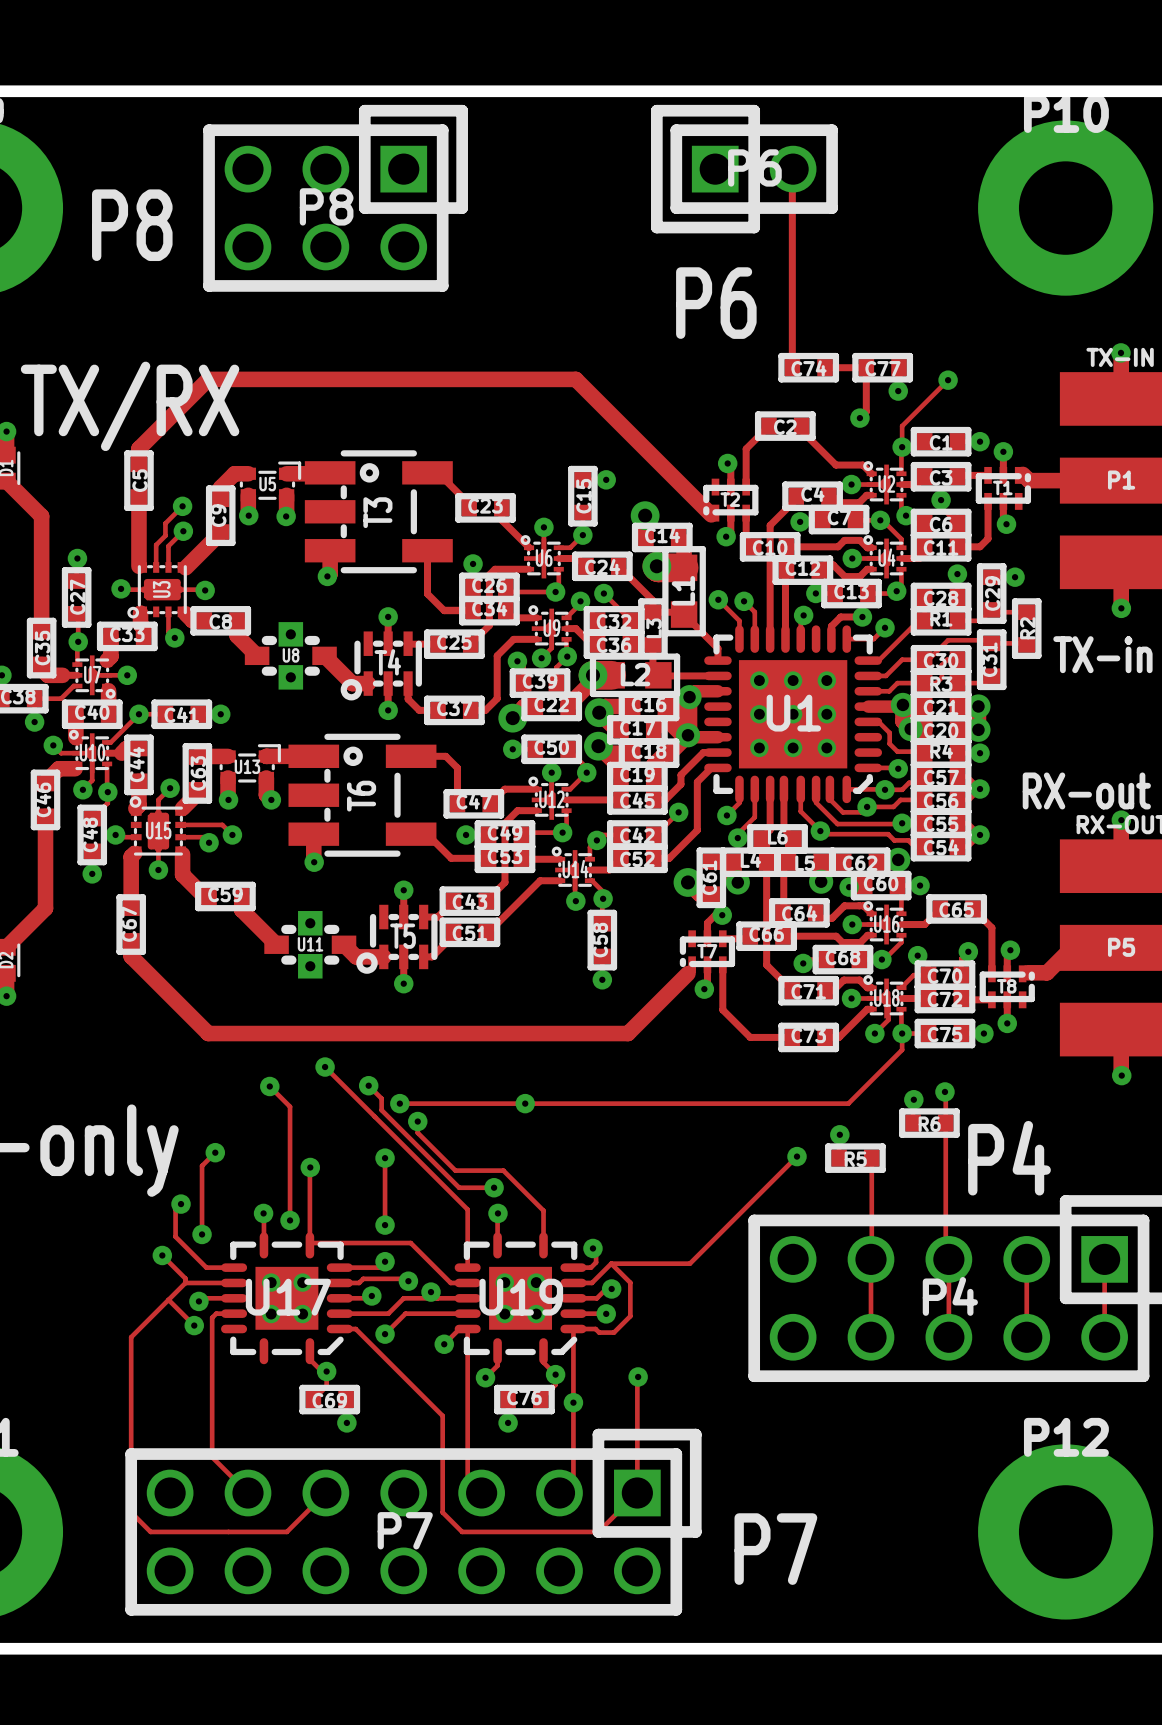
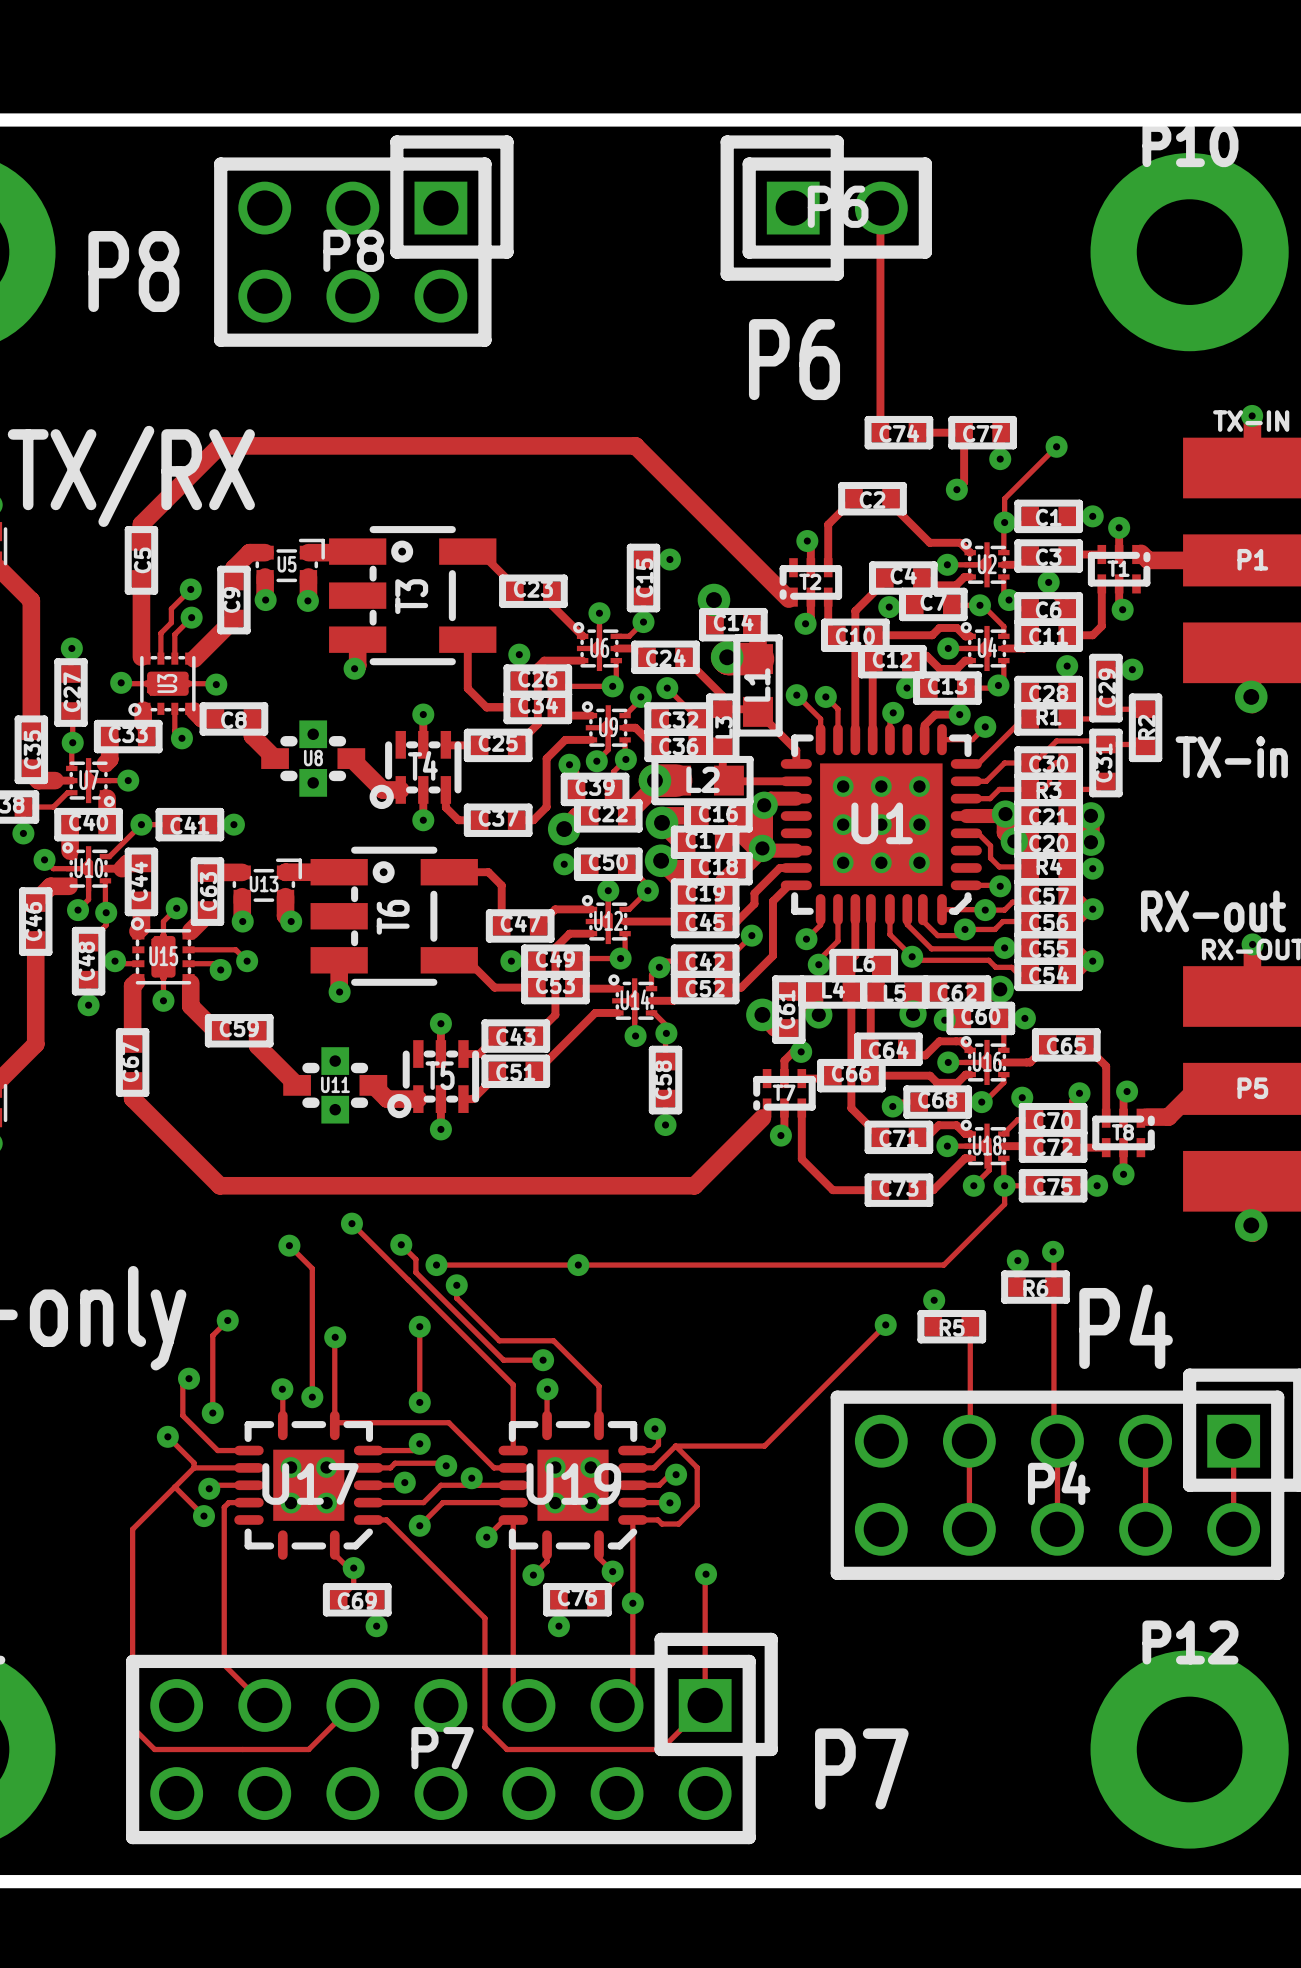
via size: [1111, 598, 1132, 619] -> [1234, 680, 1268, 714]
via size: [1112, 1065, 1132, 1086] -> [1234, 1209, 1268, 1242]

